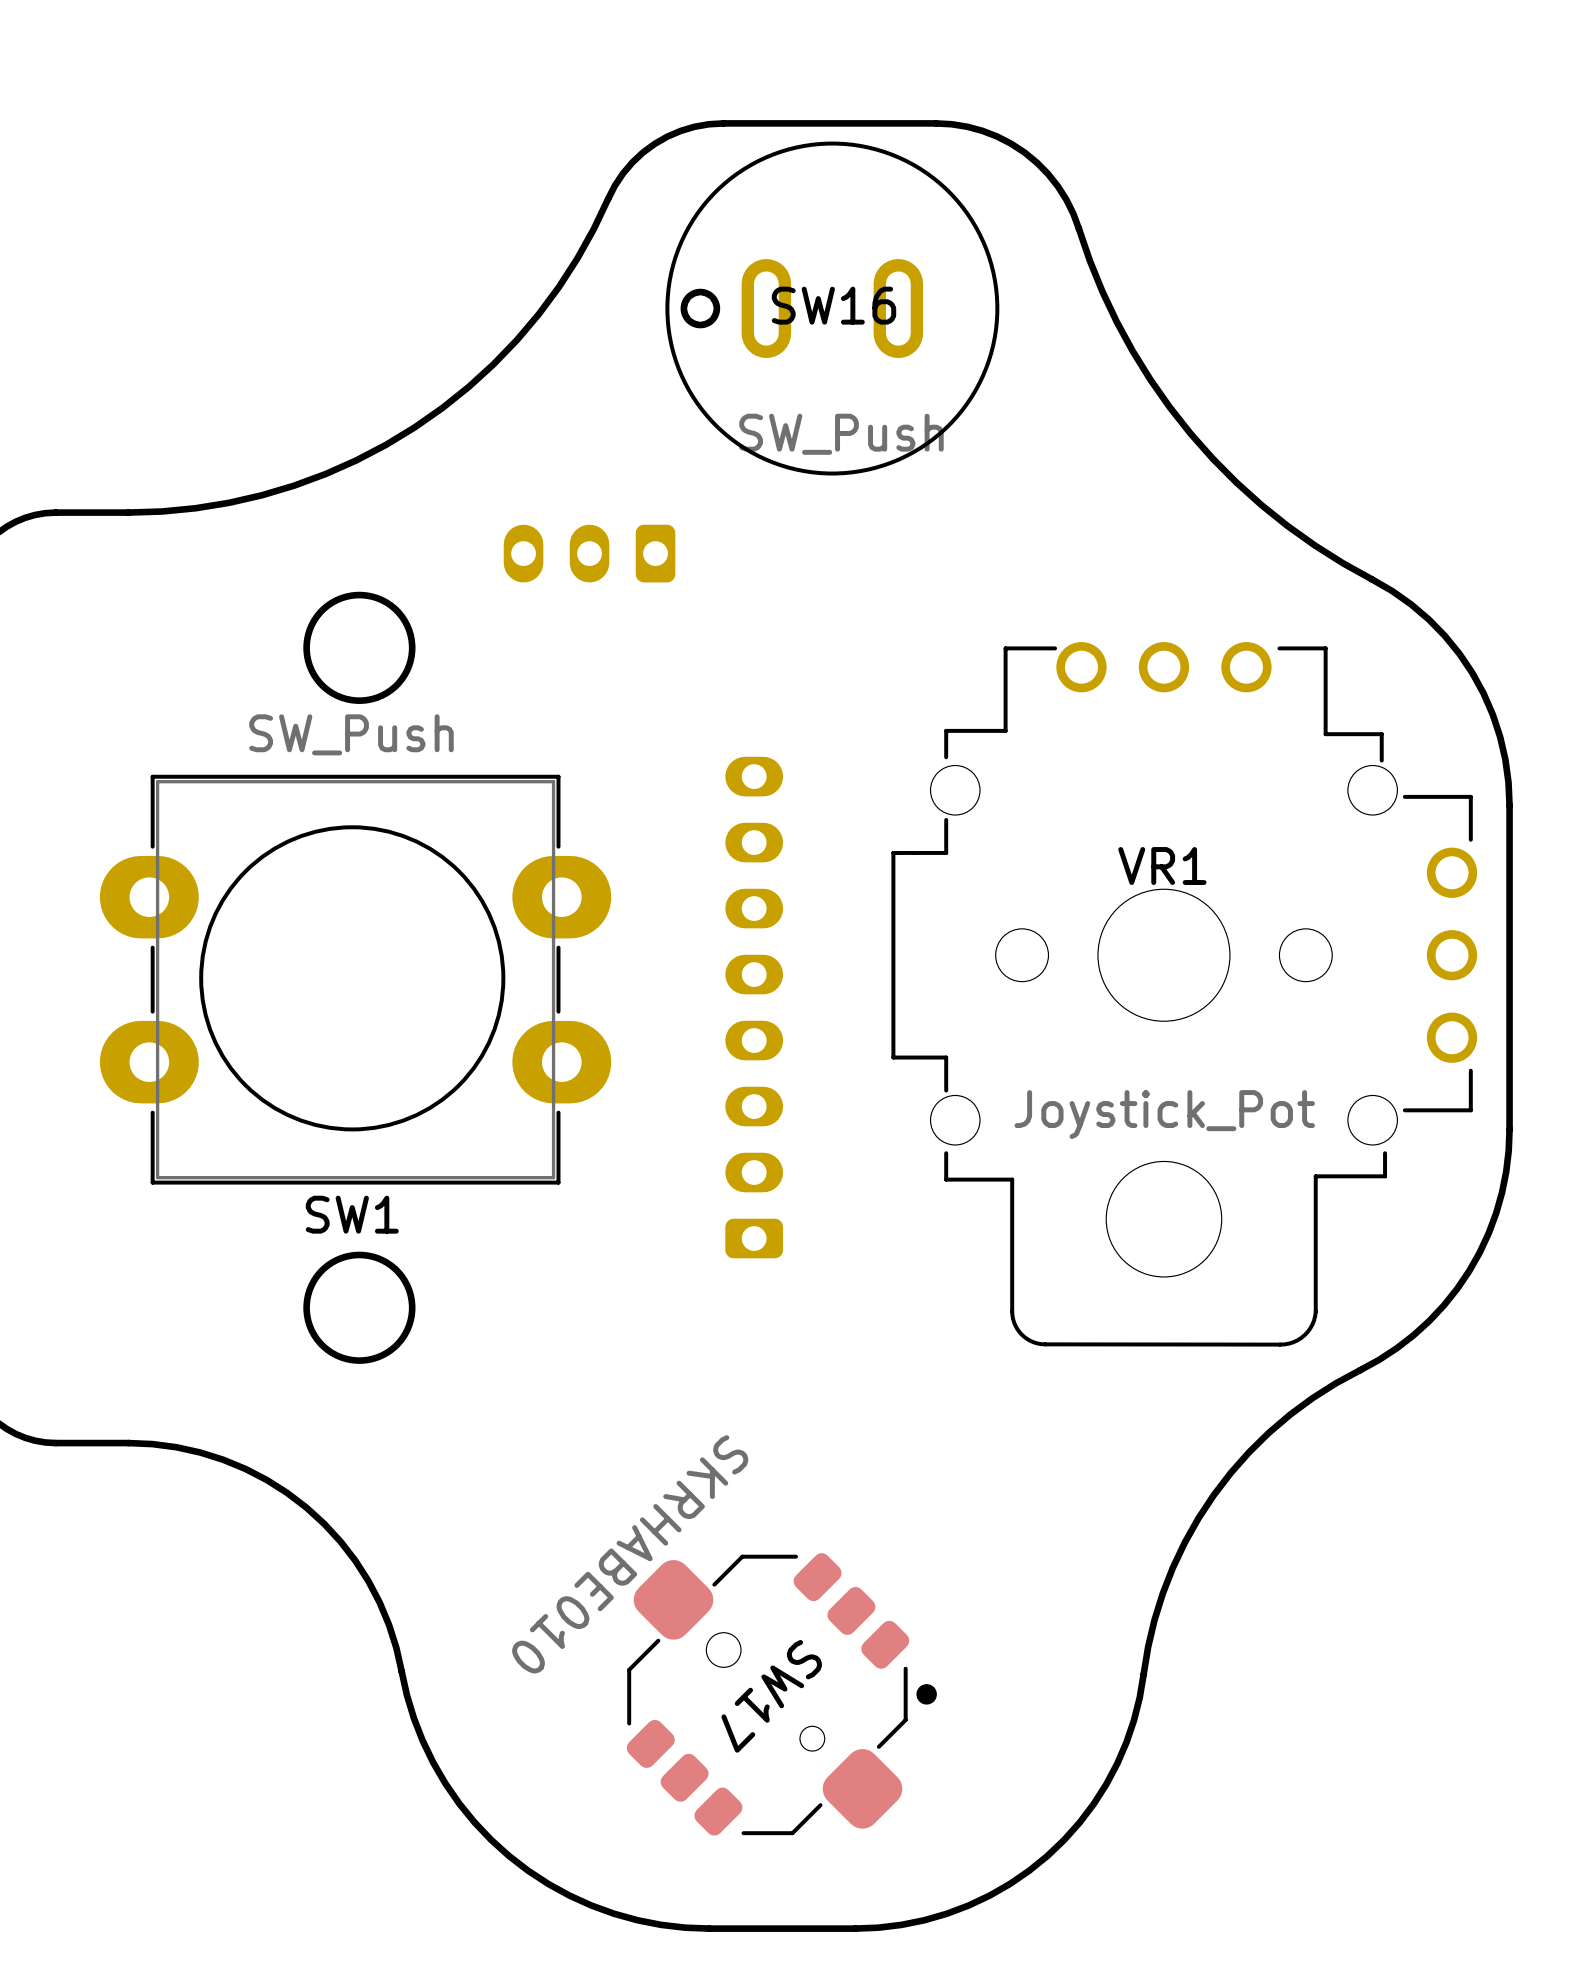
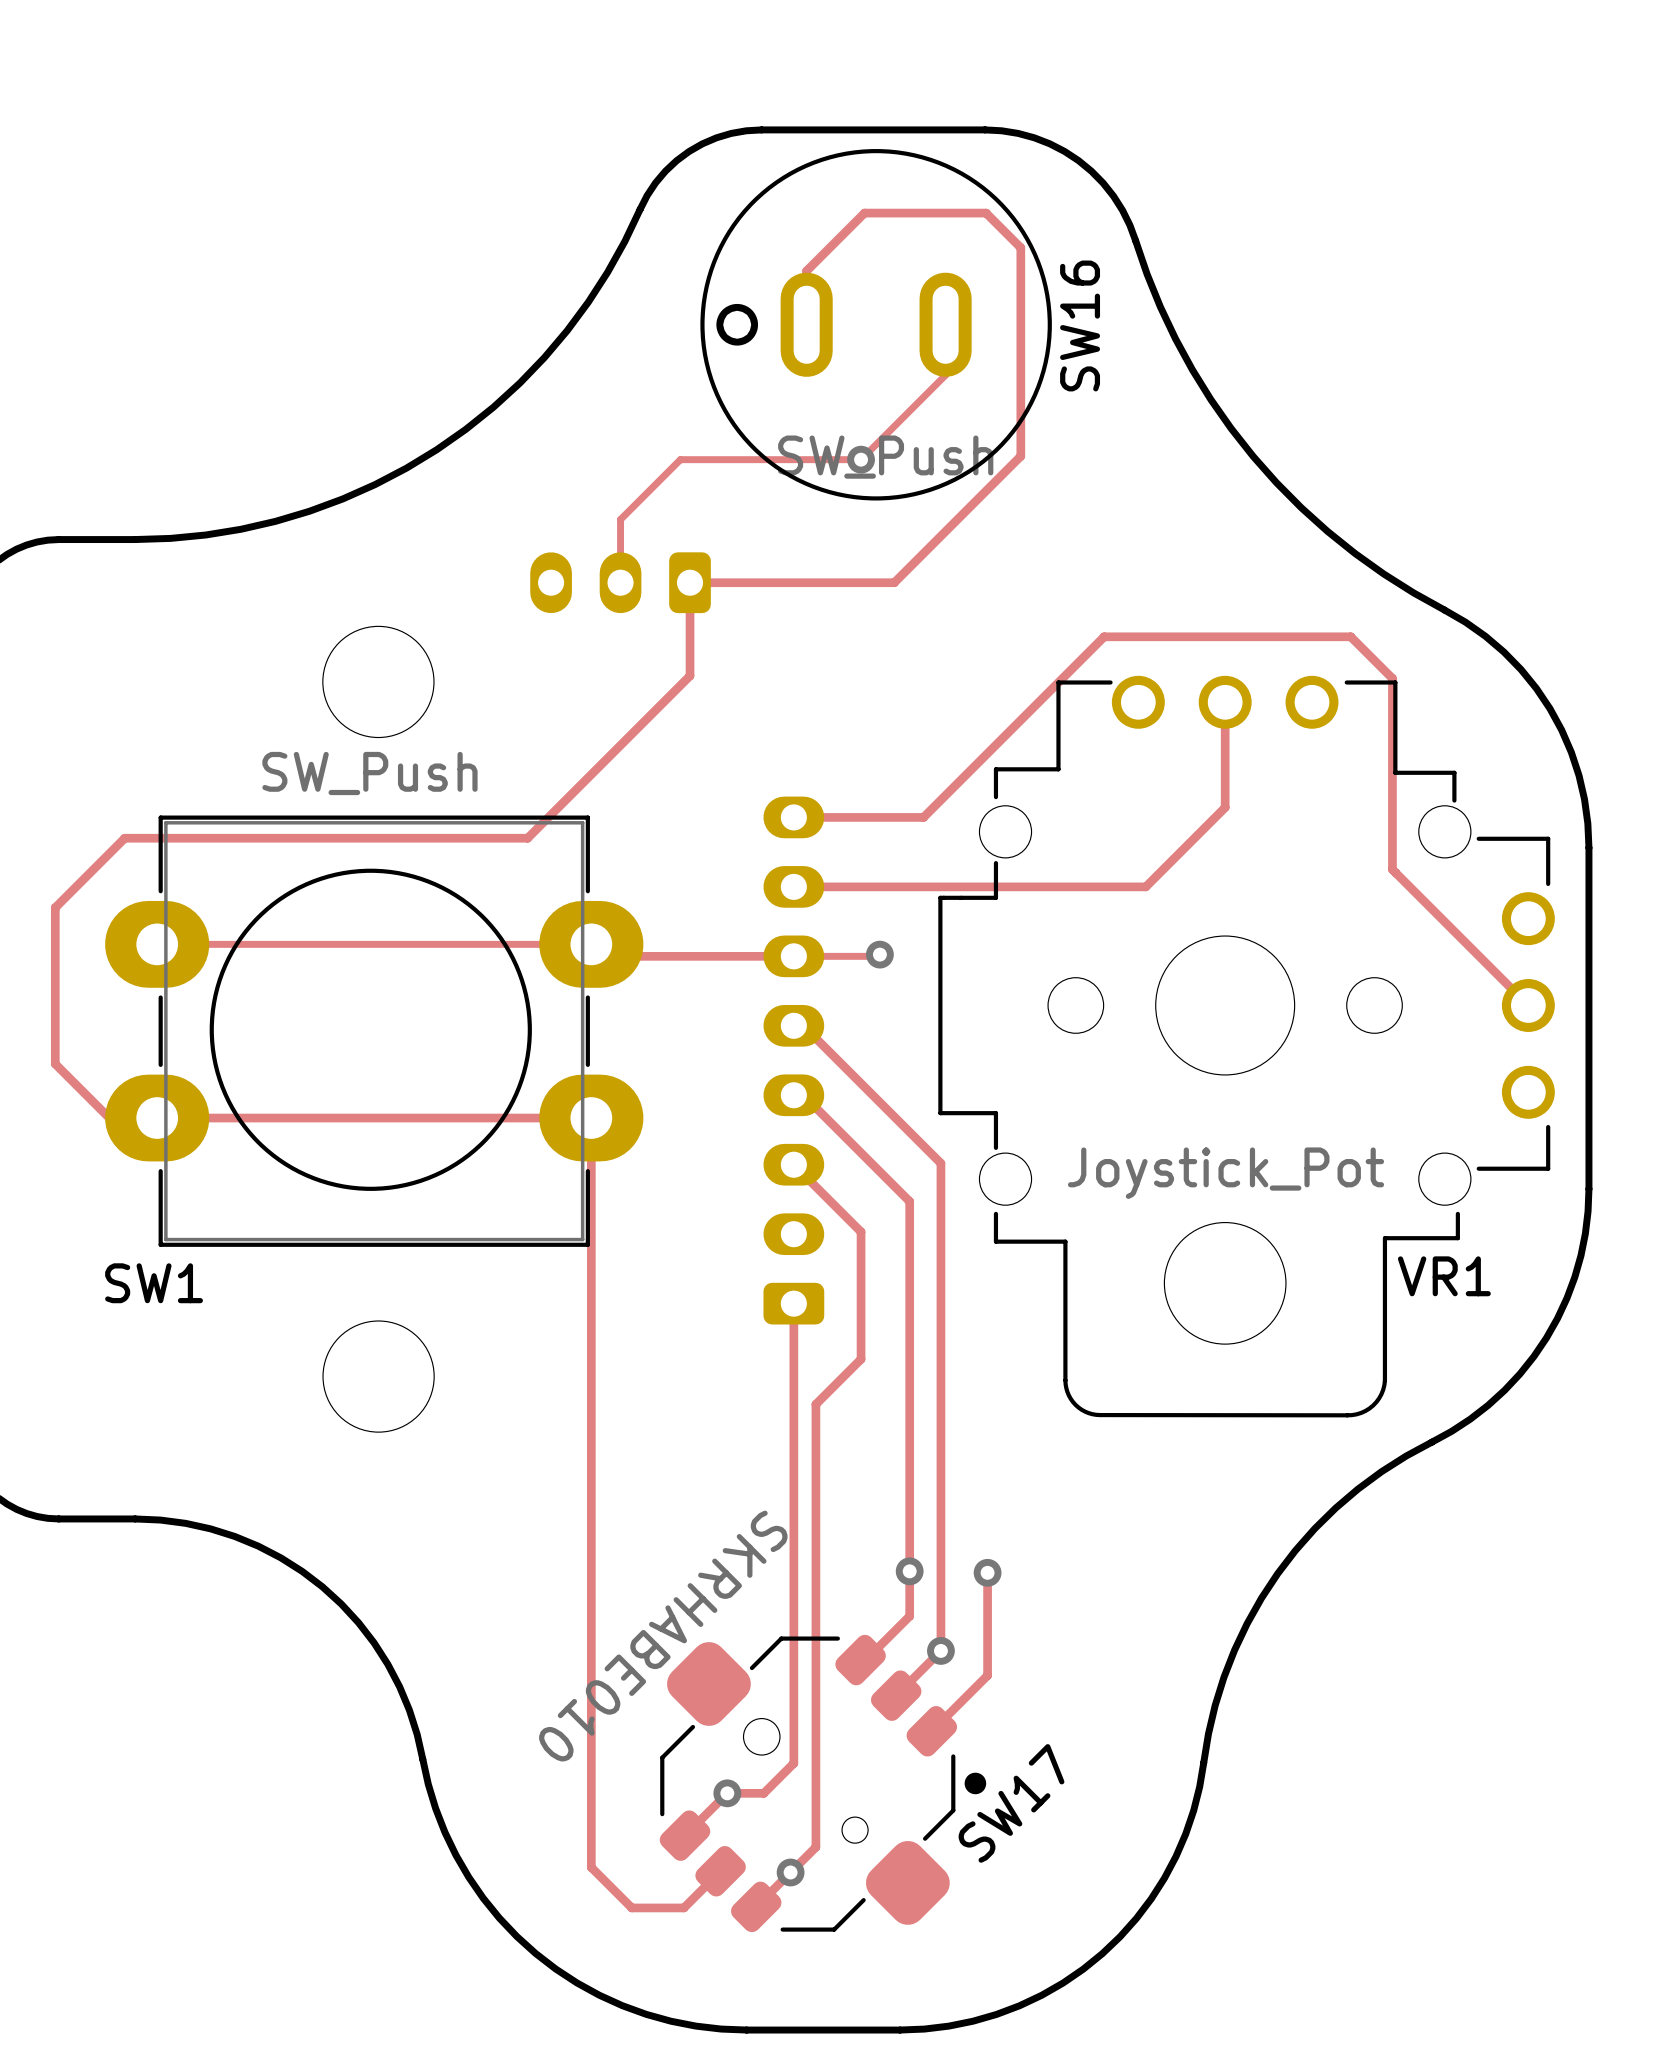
SW16 name rotation: 0° (834, 305) -> 90° counterclockwise (1080, 325)
SW16 name position: SW16 (834, 305) -> SW16 (1080, 325)
track: none -> (806, 324) (806, 270) (864, 213) (986, 213) (1020, 247) (1020, 456) (894, 582) (690, 582) (690, 675) (527, 838) (124, 838) (55, 907) (55, 1063) (109, 1118) (591, 1118) (591, 1867) (631, 1907) (683, 1907) (720, 1871)
track: none -> (945, 324) (945, 375) (861, 459) (680, 459) (620, 519) (620, 582)
via: none -> (861, 459)
round board edge: [303, 591, 416, 704] -> none
track: none -> (1225, 702) (1225, 807) (1145, 886) (793, 886)
track: none -> (793, 817) (923, 817) (1104, 636) (1350, 636) (1392, 678) (1392, 869) (1528, 1005)
VR1 name position: VR1 (1162, 866) -> VR1 (1444, 1276)
track: none -> (157, 944) (591, 944) (603, 956) (878, 956) (879, 954)
via: none -> (879, 954)
track: none -> (793, 1025) (803, 1025) (940, 1163) (940, 1650) (896, 1695)
track: none -> (793, 1095) (803, 1095) (909, 1201) (909, 1616) (865, 1660) (860, 1660)
track: none -> (793, 1164) (861, 1231) (861, 1359) (815, 1404) (815, 1847) (756, 1906)
SW1 name position: SW1 (352, 1214) -> SW1 (154, 1283)
track: none -> (793, 1303) (793, 1763) (763, 1793) (727, 1793) (685, 1835)
round board edge: [303, 1251, 416, 1364] -> none
via: none -> (909, 1571)
track: none -> (987, 1572) (987, 1675) (931, 1731)
via: none -> (987, 1572)
via: none -> (940, 1650)
SW17 name rotation: 0° (771, 1696) -> 180° (1011, 1803)
SW17 name position: SW17 (771, 1696) -> SW17 (1011, 1803)
via: none -> (727, 1793)
via: none -> (790, 1872)

